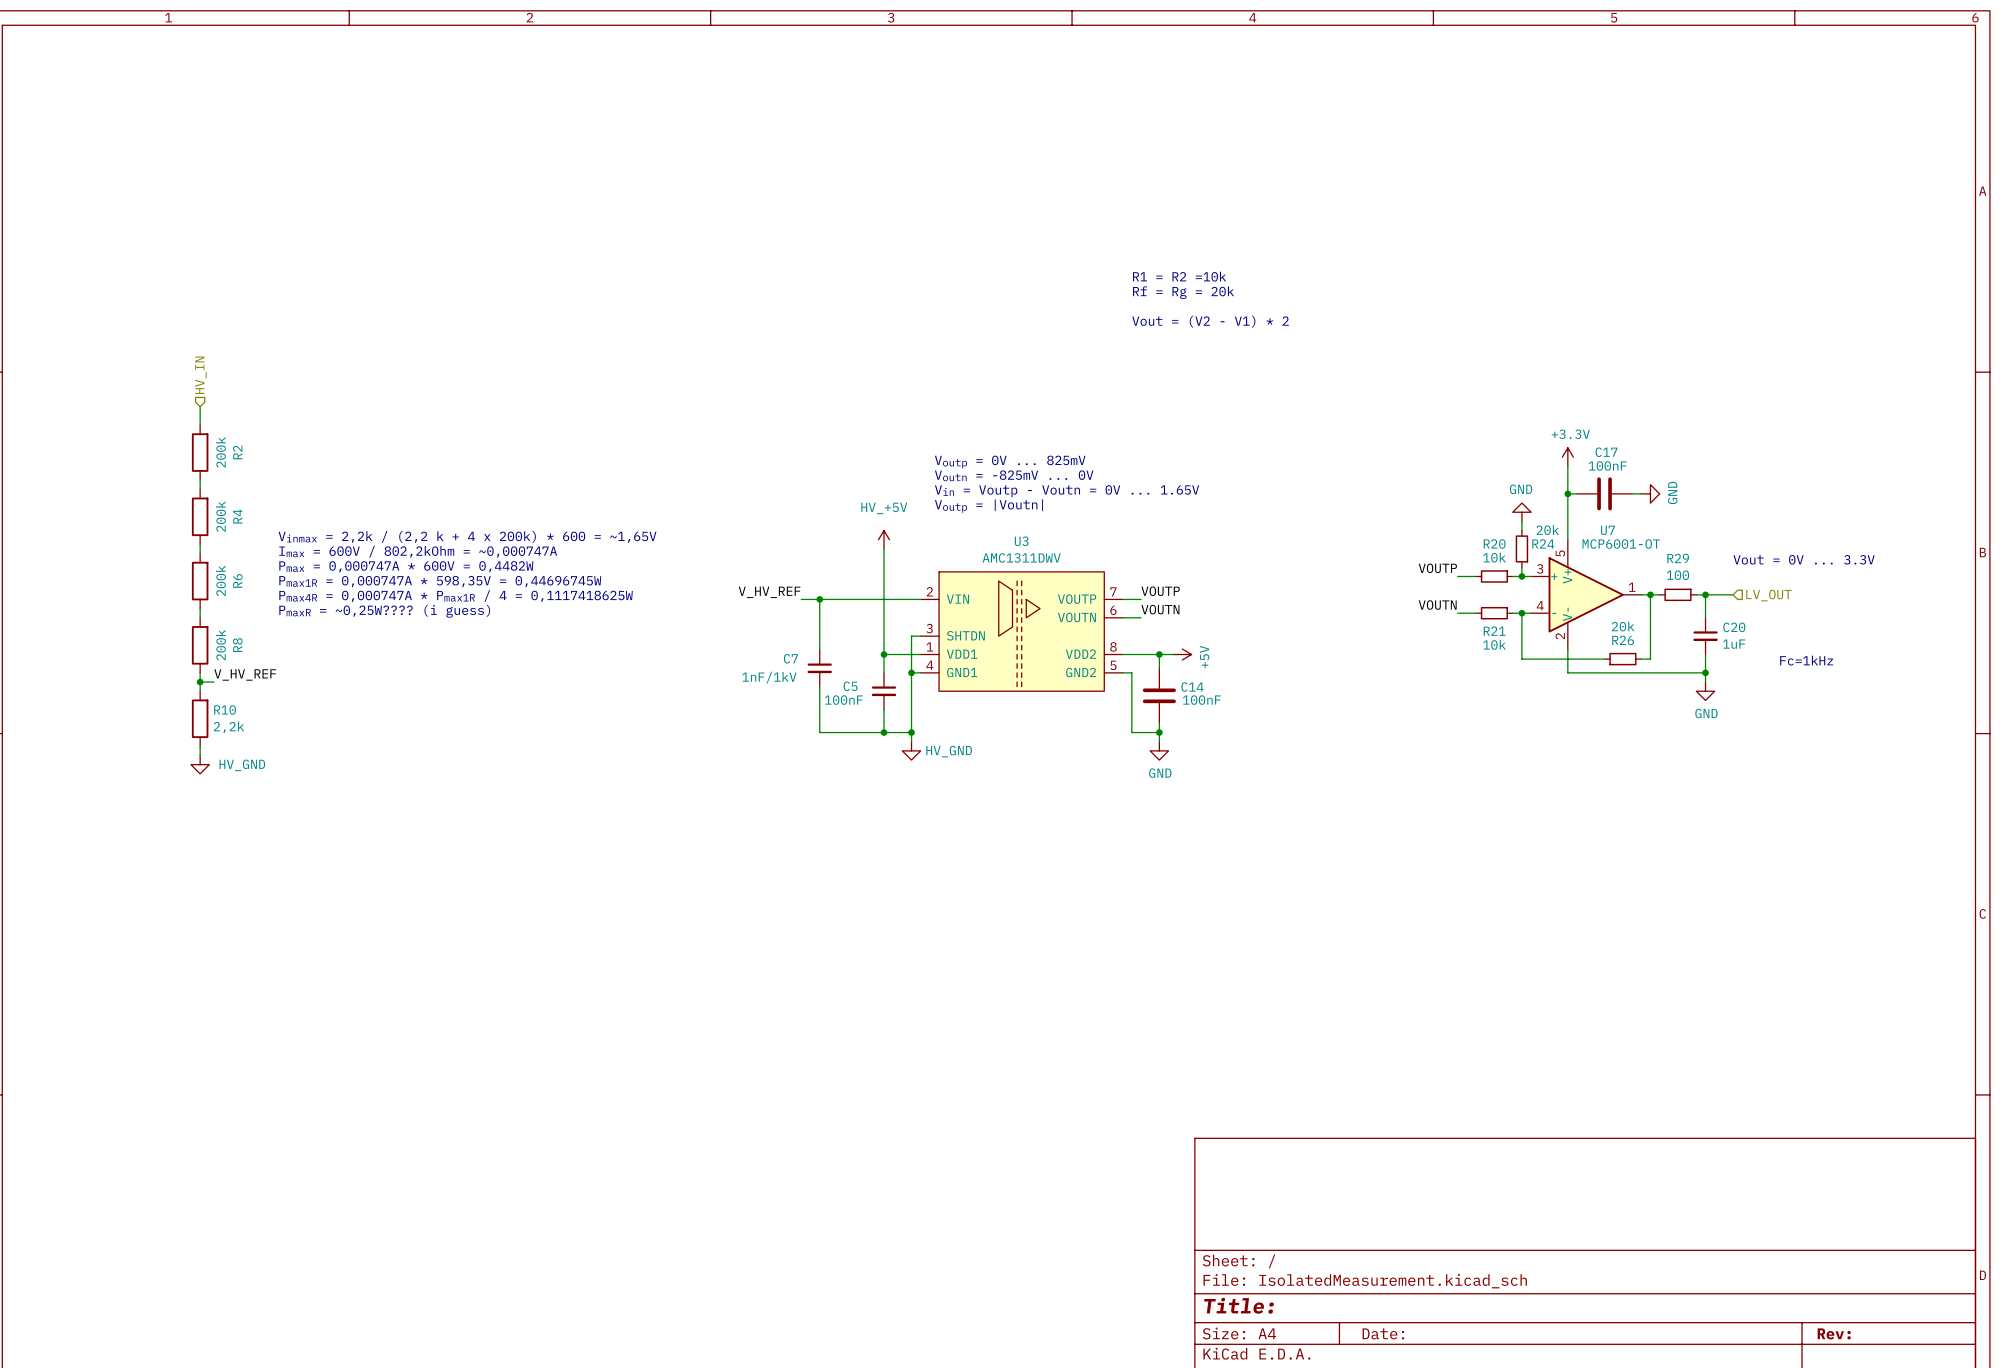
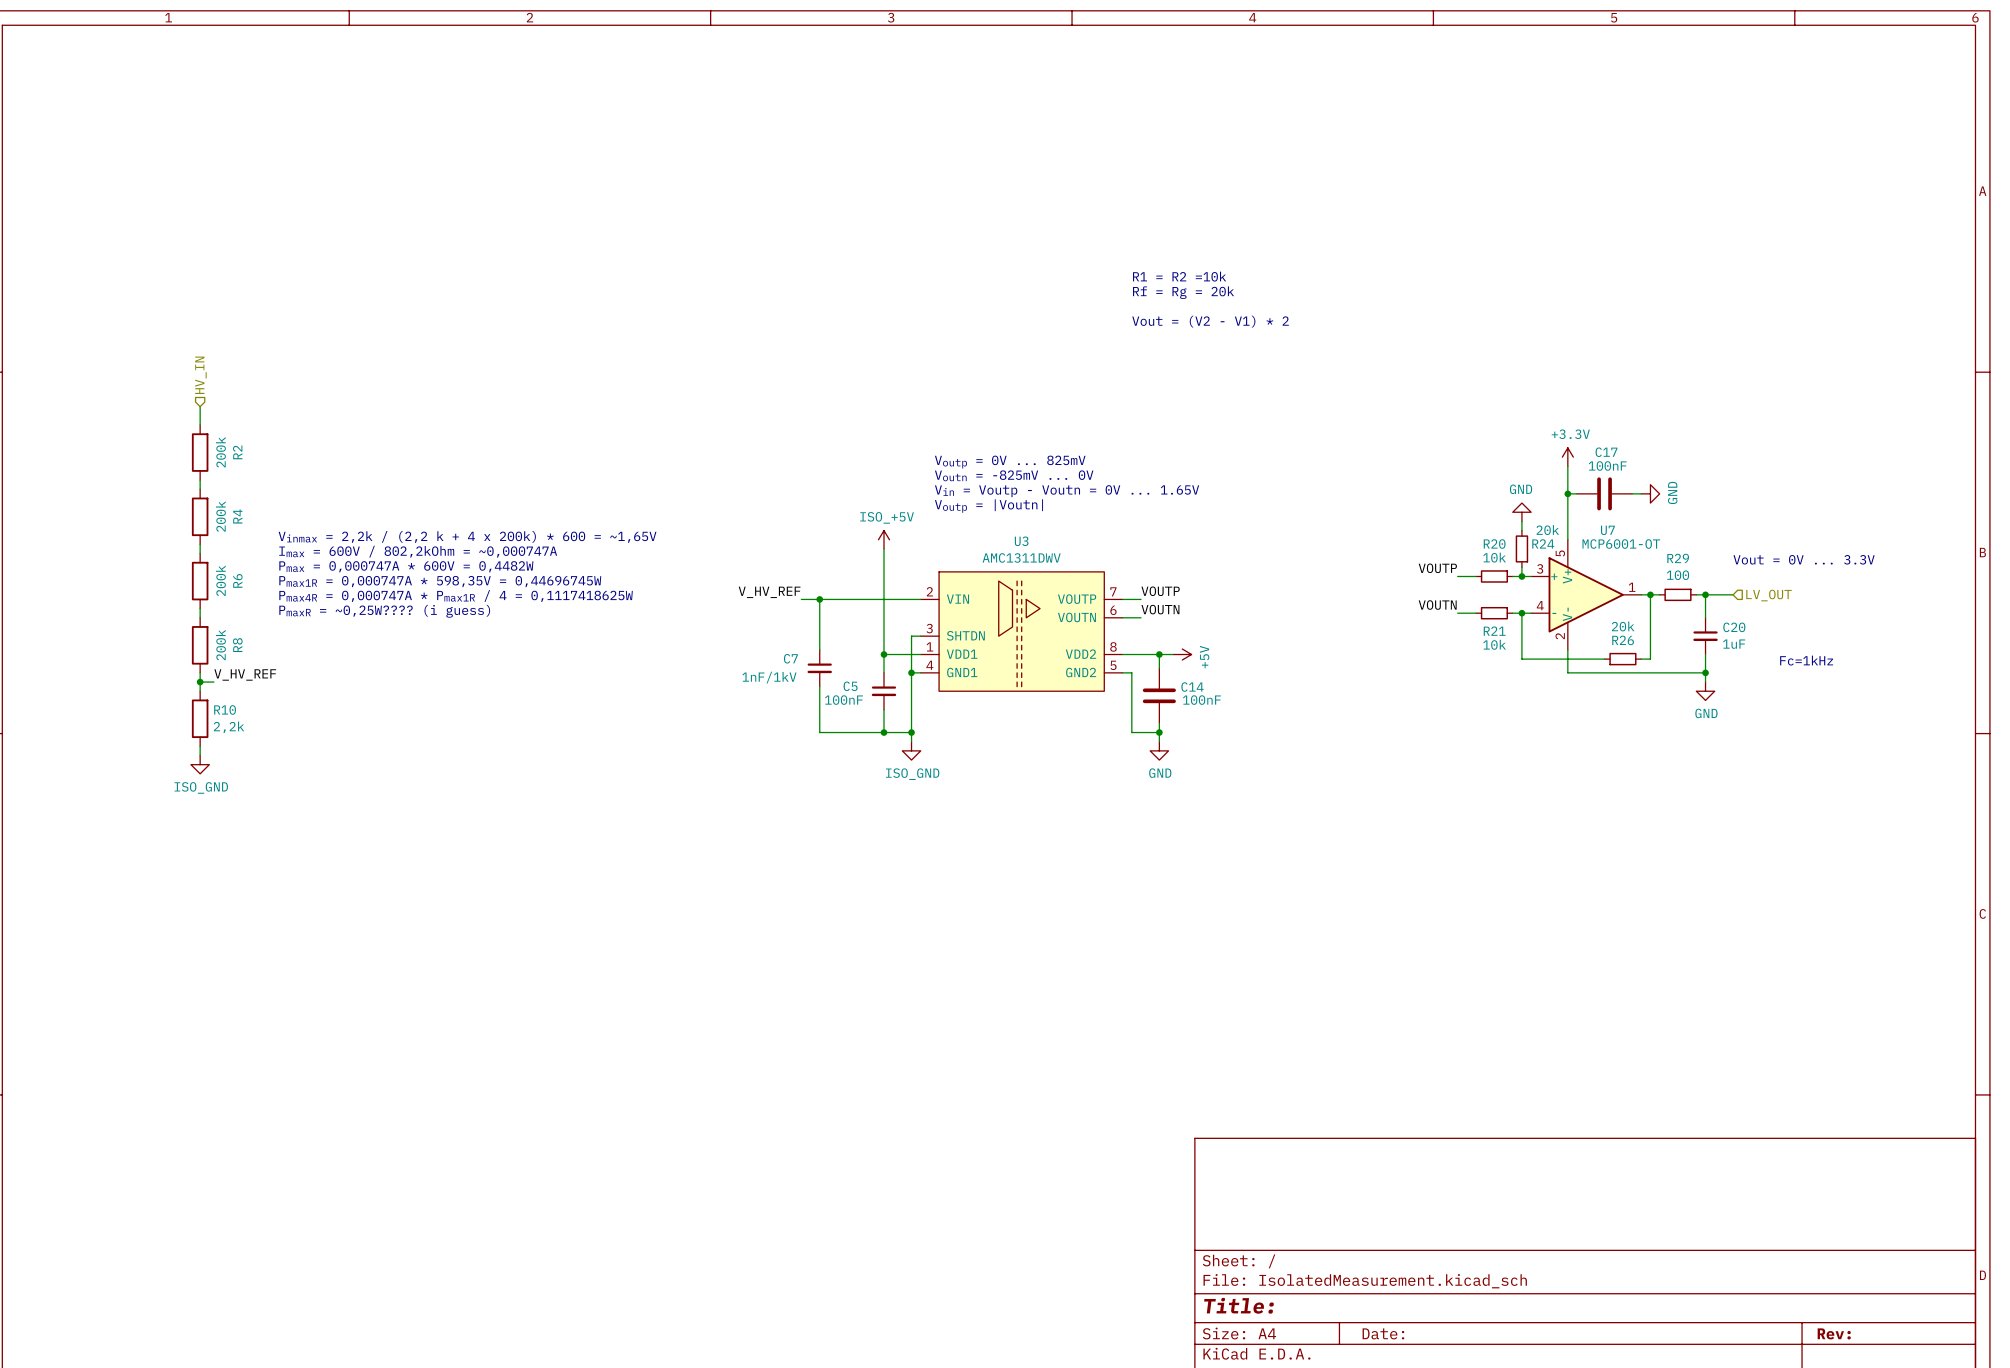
power symbol: HV_+5V (883, 539) -> ISO_+5V (883, 539)
power symbol: HV_GND (911, 750) -> ISO_GND (911, 750)
power symbol: HV_GND (200, 764) -> ISO_GND (200, 764)

